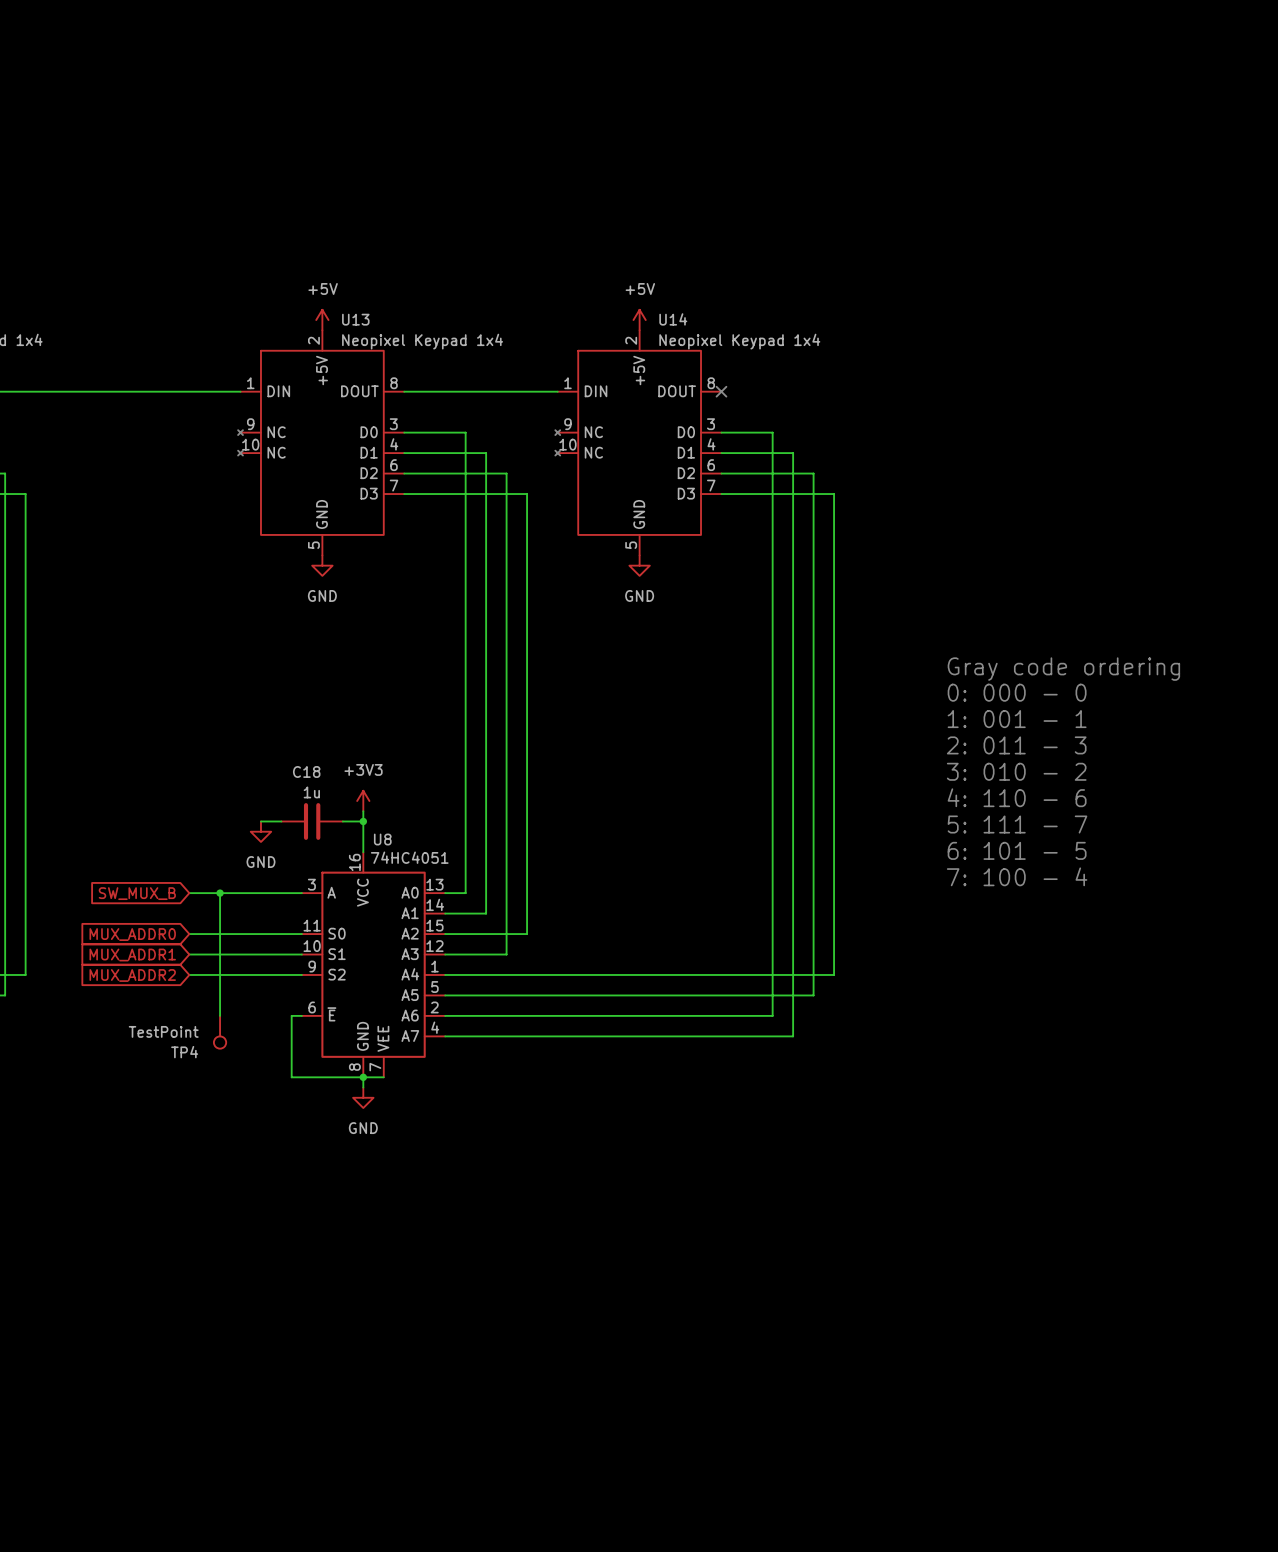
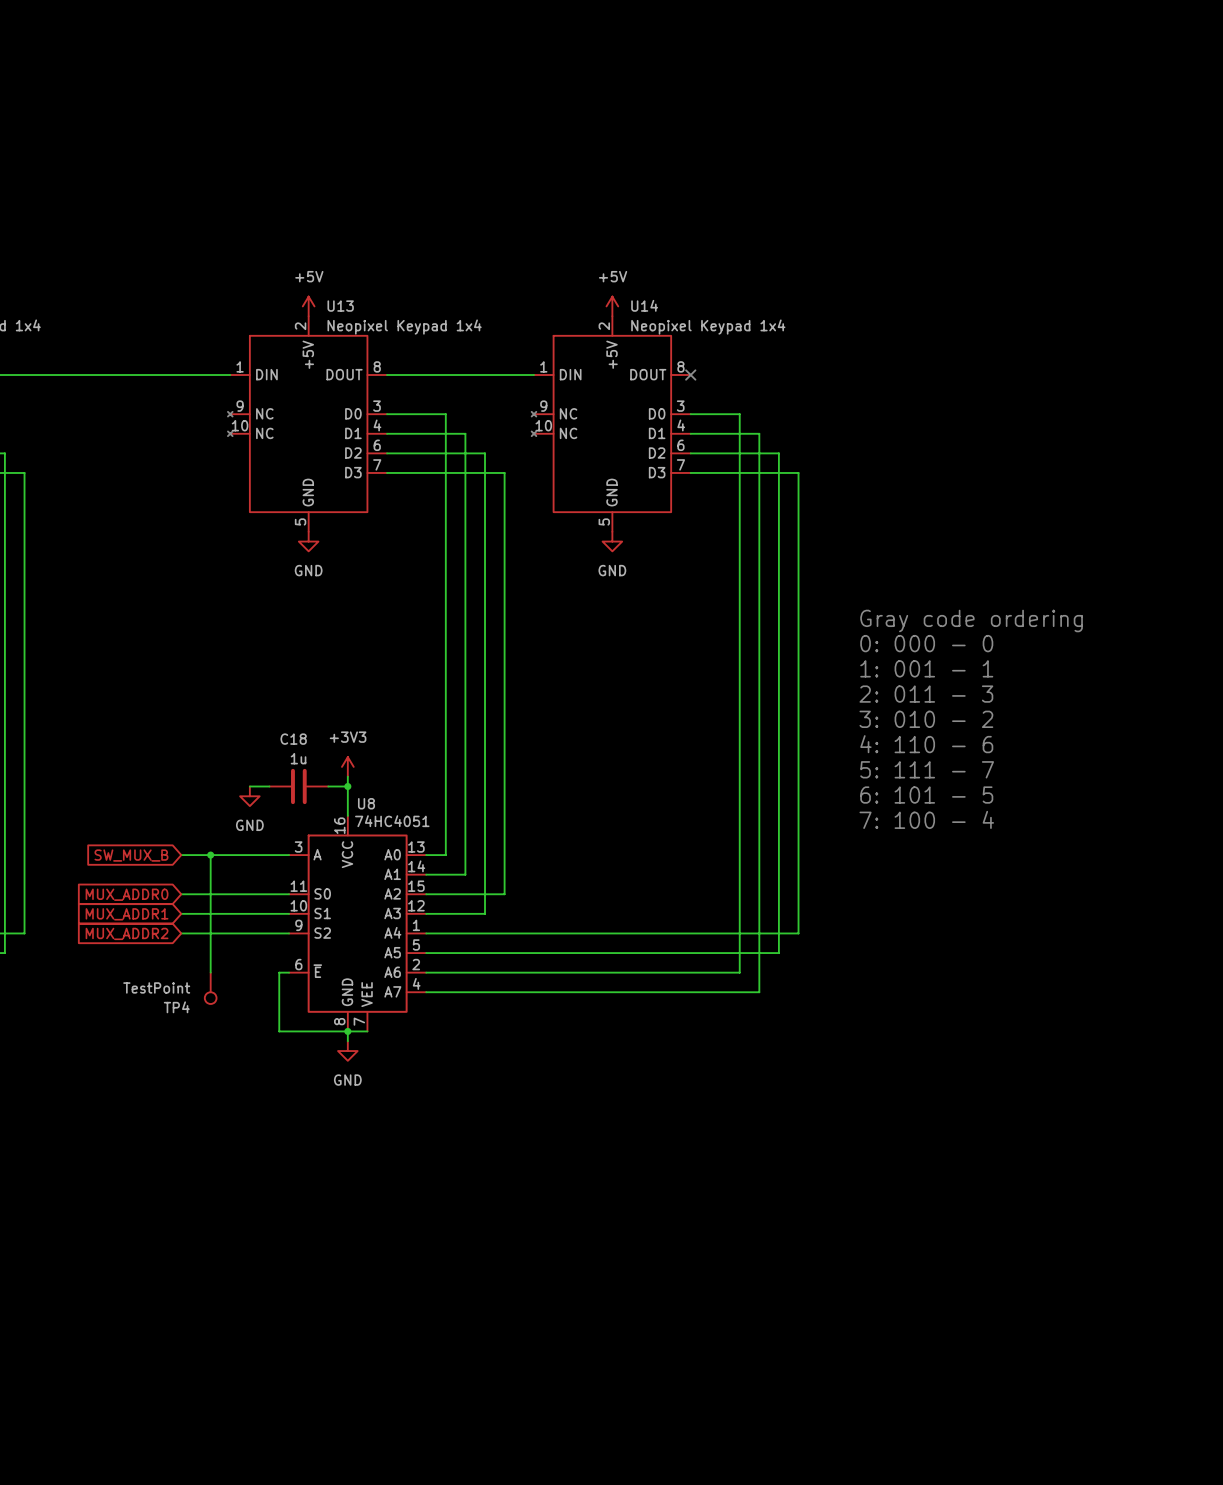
text position: Gray code ordering (1063, 669) -> Gray code ordering (971, 620)
text position: 0: 000 - 0 (1017, 692) -> 0: 000 - 0 (926, 643)
text position: 1: 001 - 1 (1017, 719) -> 1: 001 - 1 (926, 668)
text position: 2: 011 - 3 (1016, 745) -> 2: 011 - 3 (926, 694)
text position: 3: 010 - 2 (1016, 771) -> 3: 010 - 2 (926, 719)
text position: 4: 110 - 6 (1017, 797) -> 4: 110 - 6 (926, 744)
text position: 5: 111 - 7 (1017, 824) -> 5: 111 - 7 (927, 769)
text position: 6: 101 - 5 (1017, 850) -> 6: 101 - 5 (926, 795)
text position: 7: 100 - 4 (1017, 876) -> 7: 100 - 4 (926, 819)

